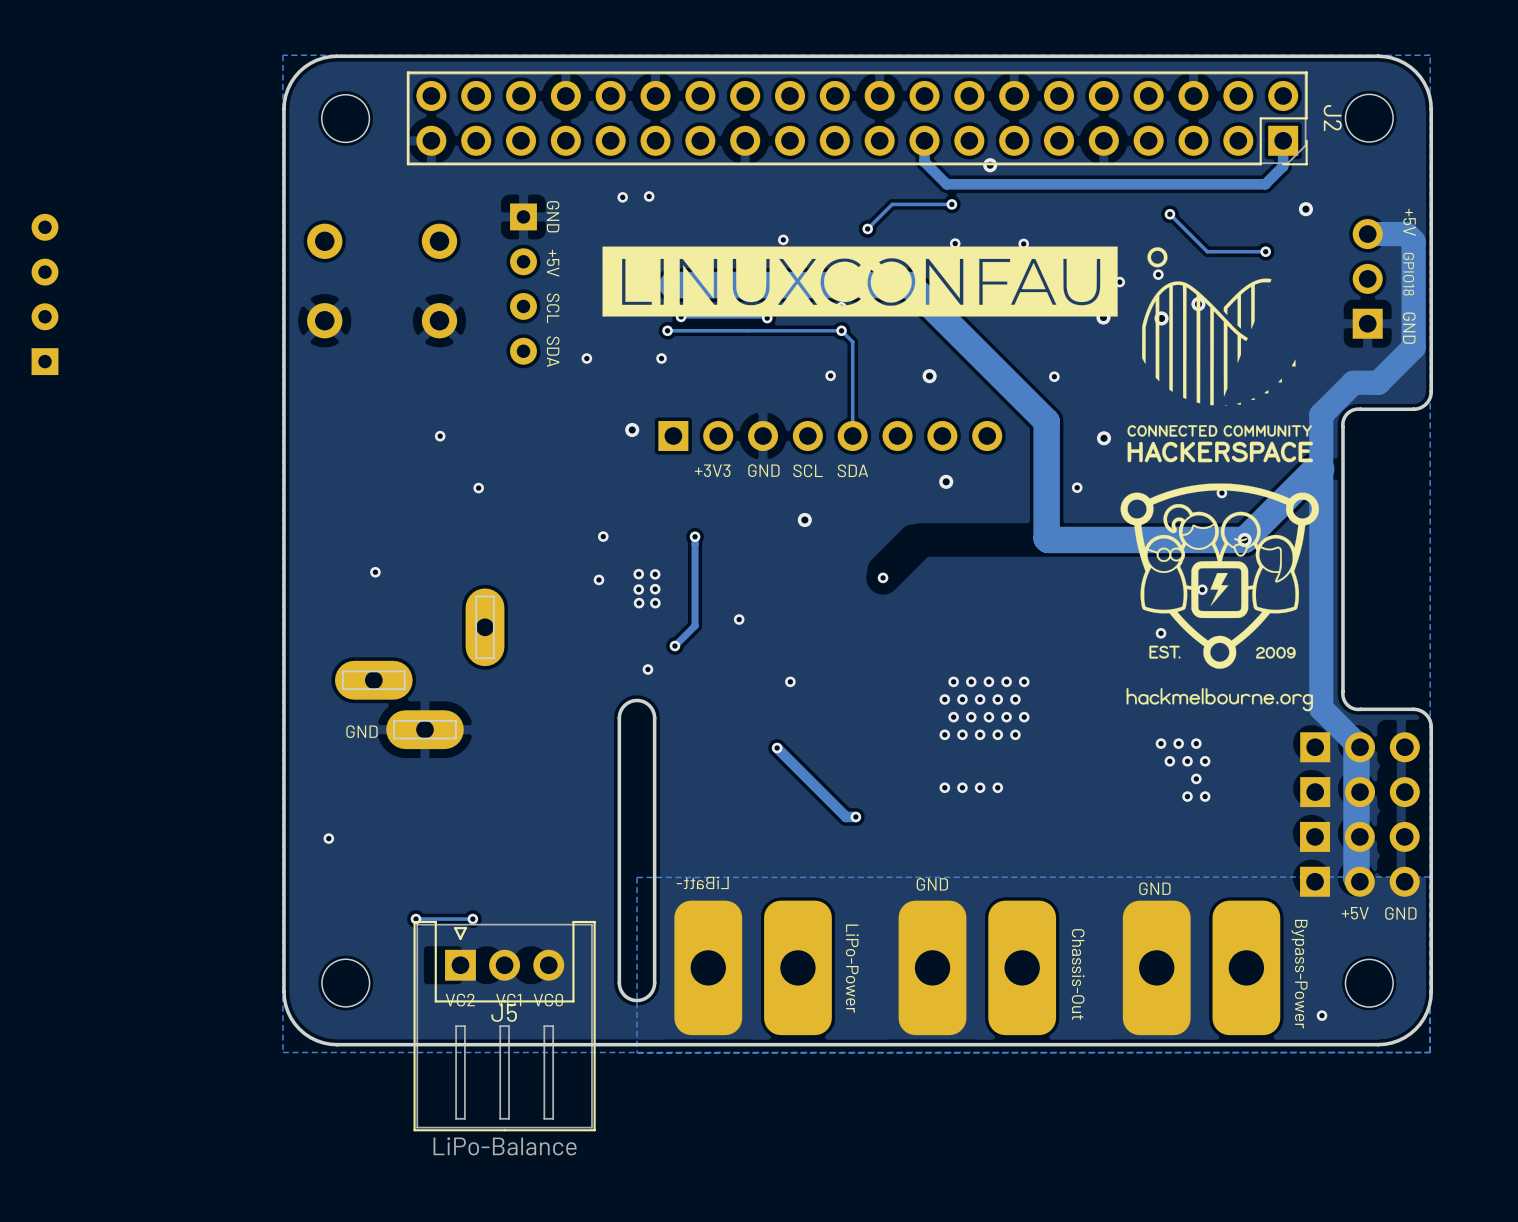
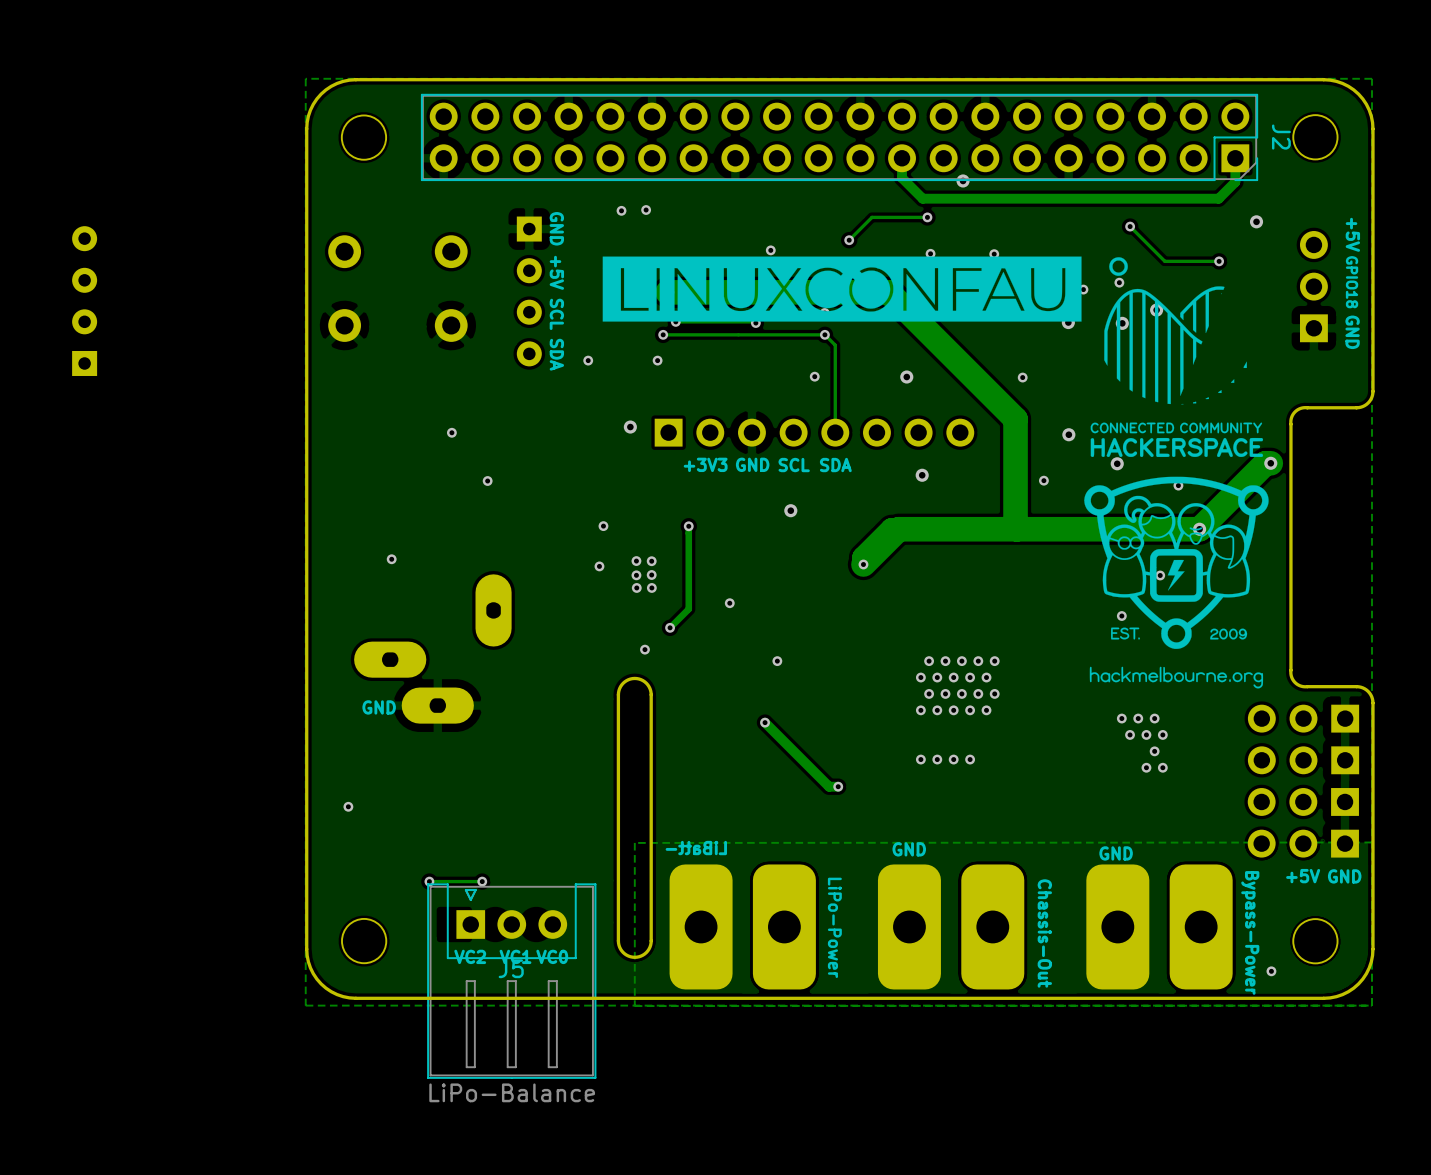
track: (1367, 234) (1406, 234) (1413, 241) (1413, 347) (1378, 382) (1353, 382) (1321, 414) (1321, 708) (1356, 743) (1356, 878) -> none
via: none -> (1270, 463)
via: none -> (1117, 463)
track: none -> (1016, 529) (898, 529) (863, 564) (863, 557) (891, 529) (1015, 529)
part rotation: 0° (1360, 747) -> 180° (1303, 718)
part rotation: 0° (1360, 792) -> 180° (1303, 760)
part rotation: 0° (1359, 836) -> 180° (1303, 801)
part rotation: 0° (1359, 881) -> 180° (1303, 843)

